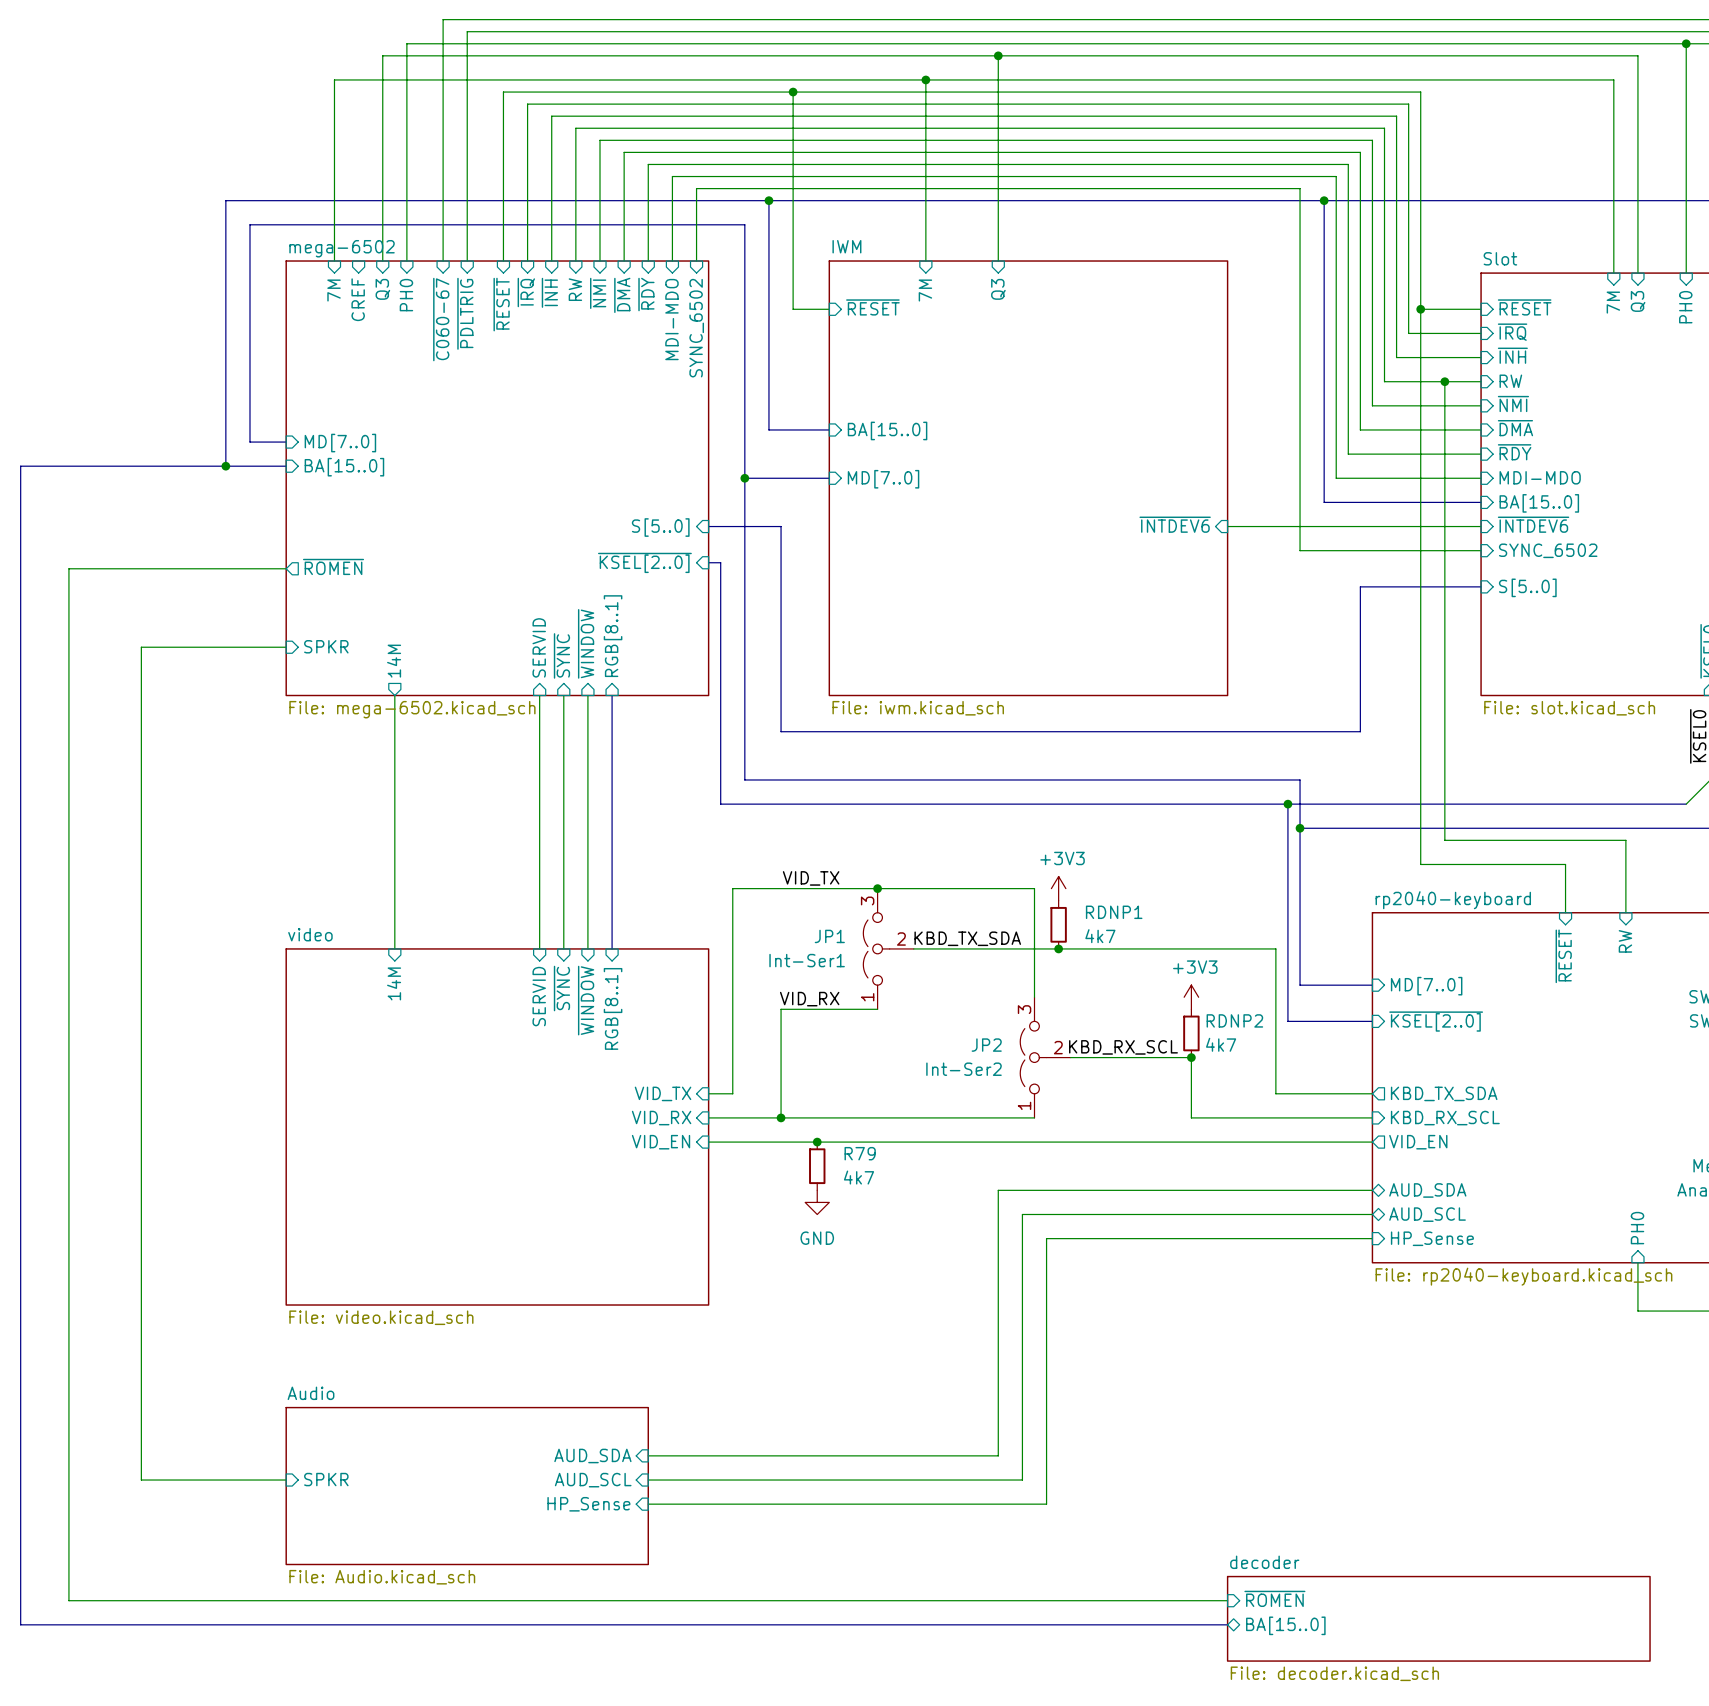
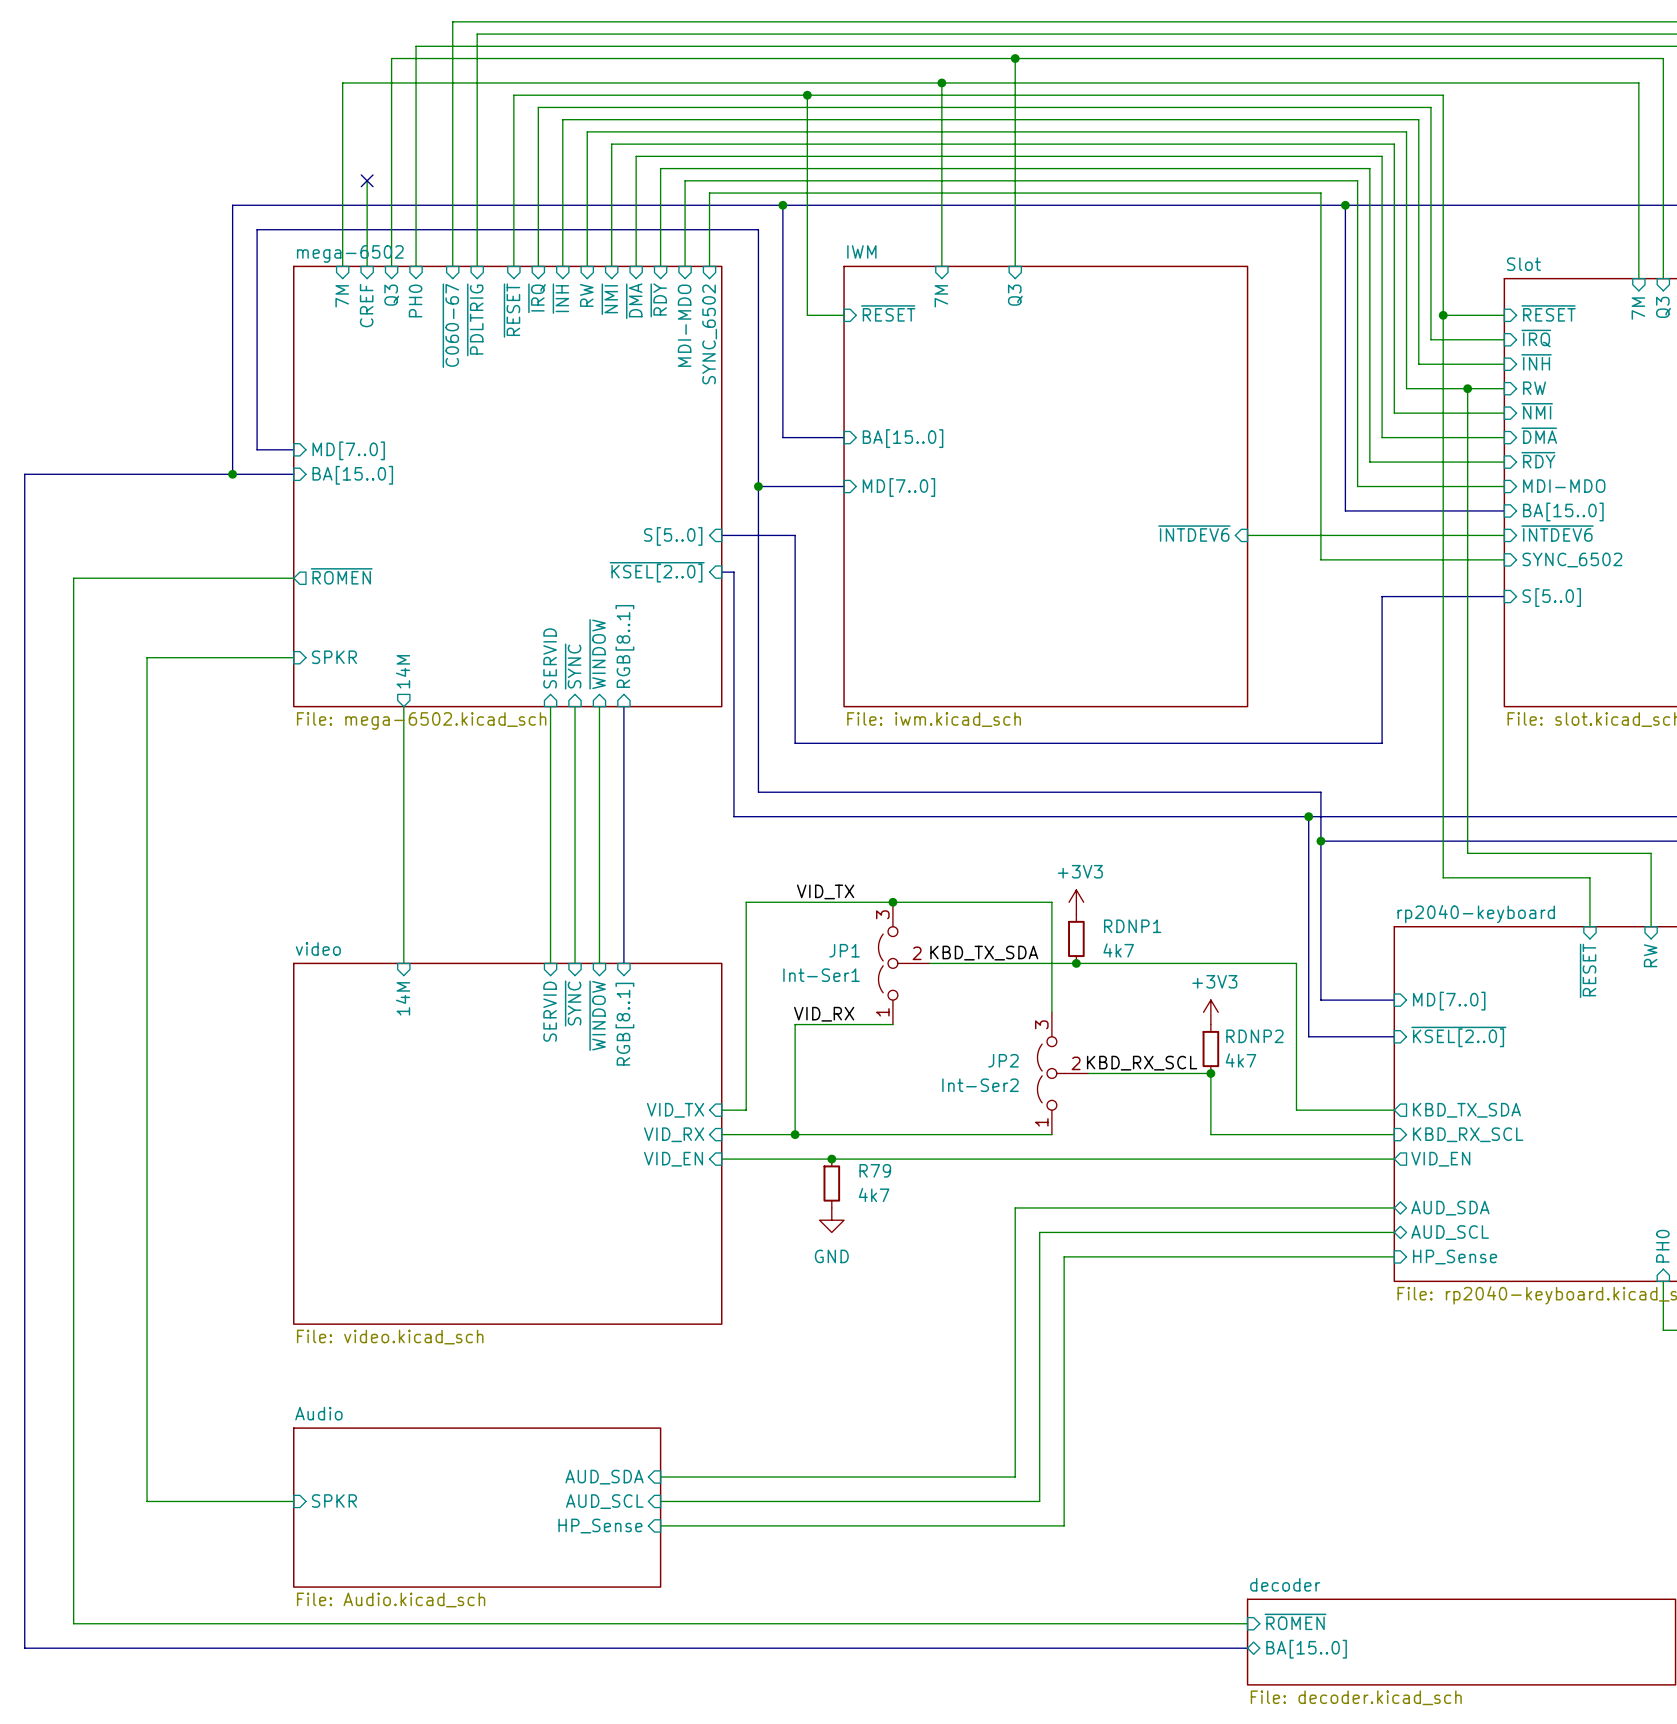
wire: none -> (367, 180) (367, 266)
no-connect mark: none -> (367, 180)

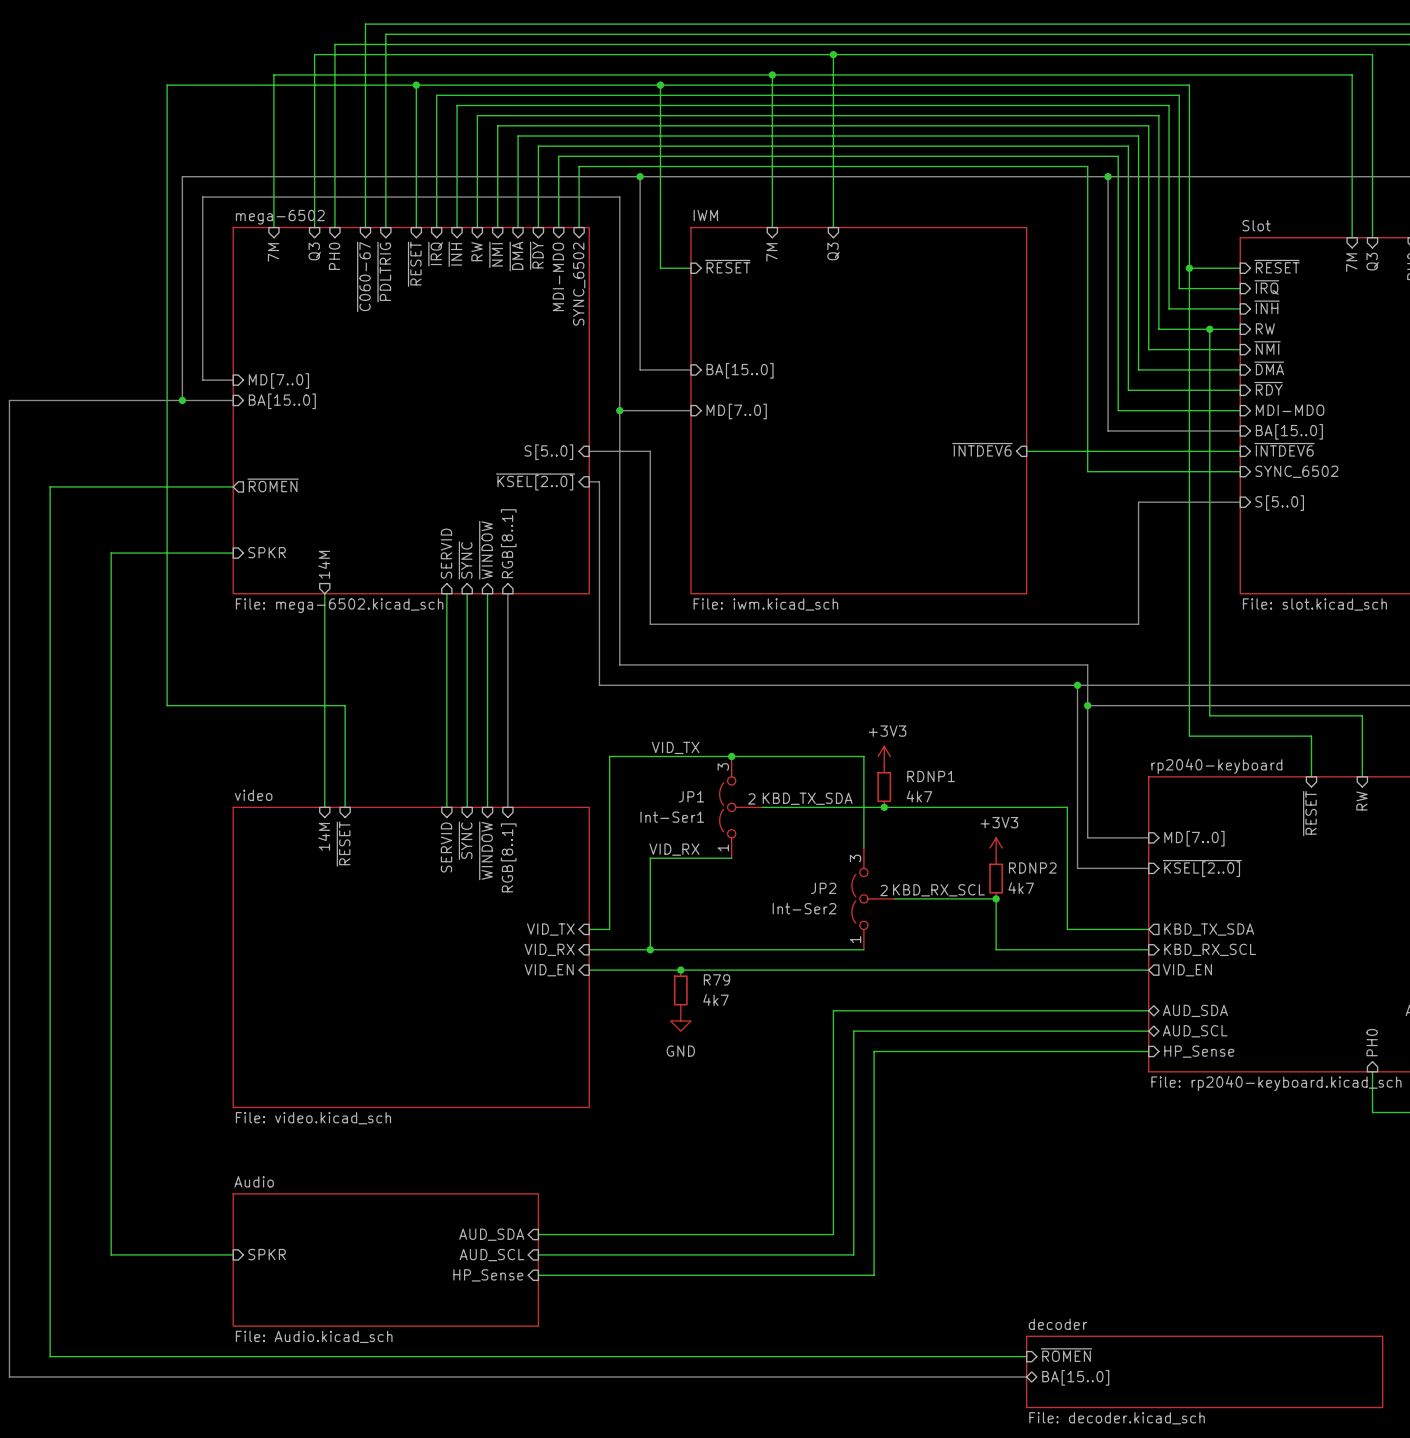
wire: none -> (416, 85) (167, 85) (167, 705) (345, 705) (345, 807)
junction: none -> (416, 85)
wire: (367, 180) (367, 266) -> none
no-connect mark: (367, 180) -> none
sheet pin: CREF (366, 305) -> none
sheet pin: none -> ~{RESET} (343, 844)

